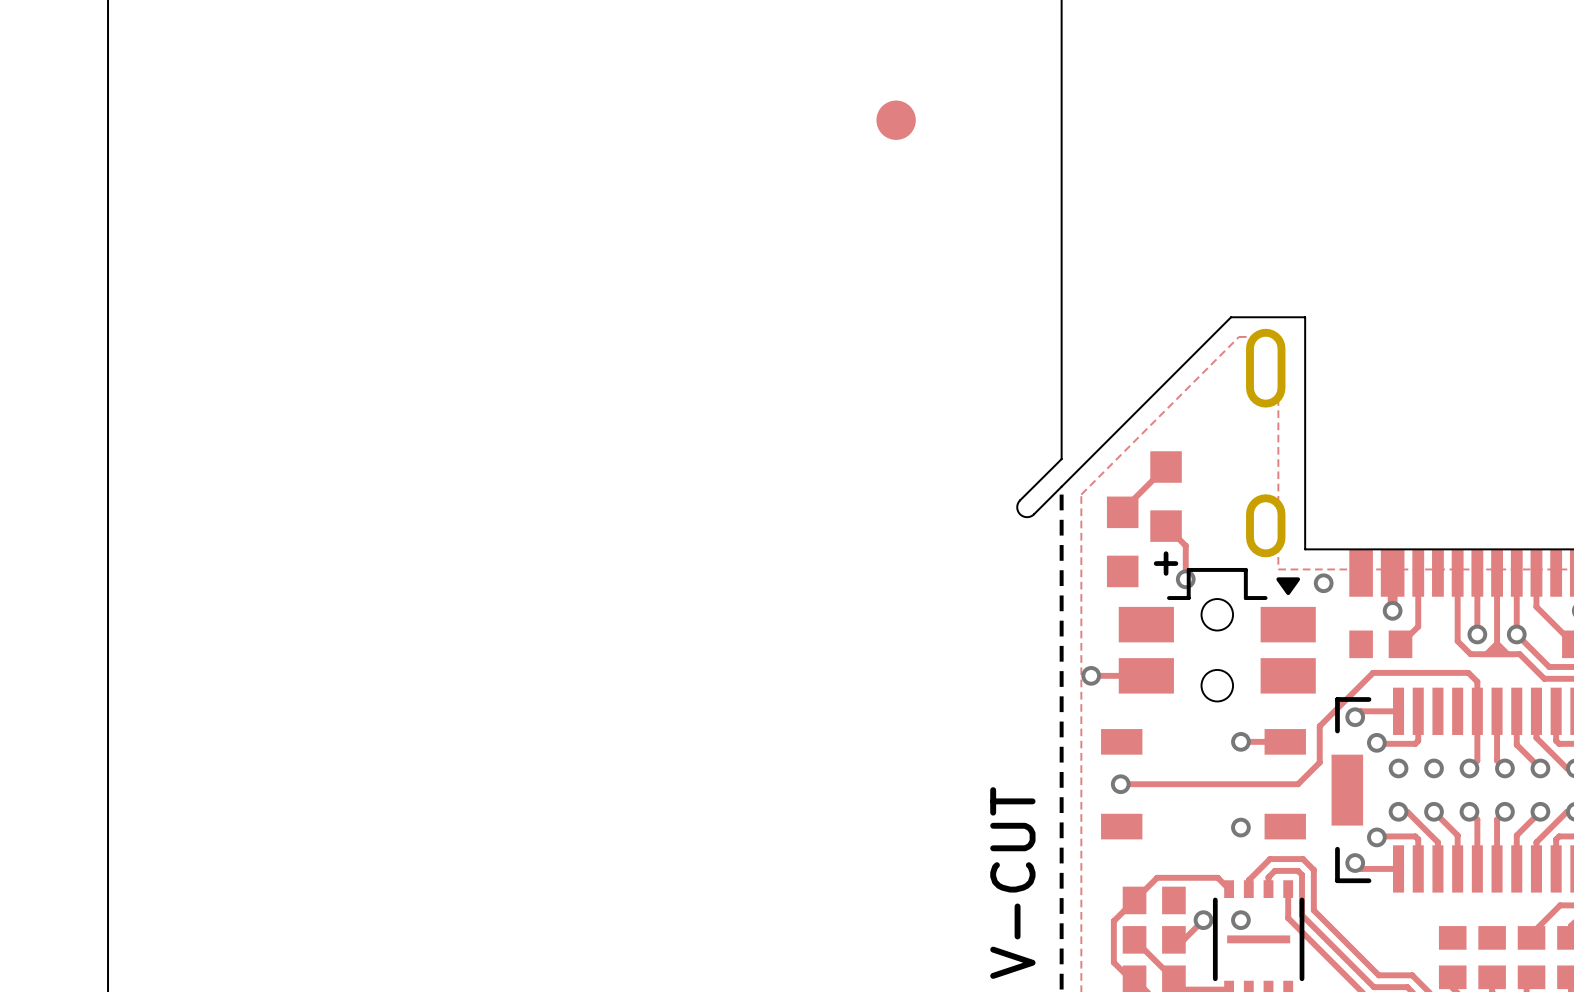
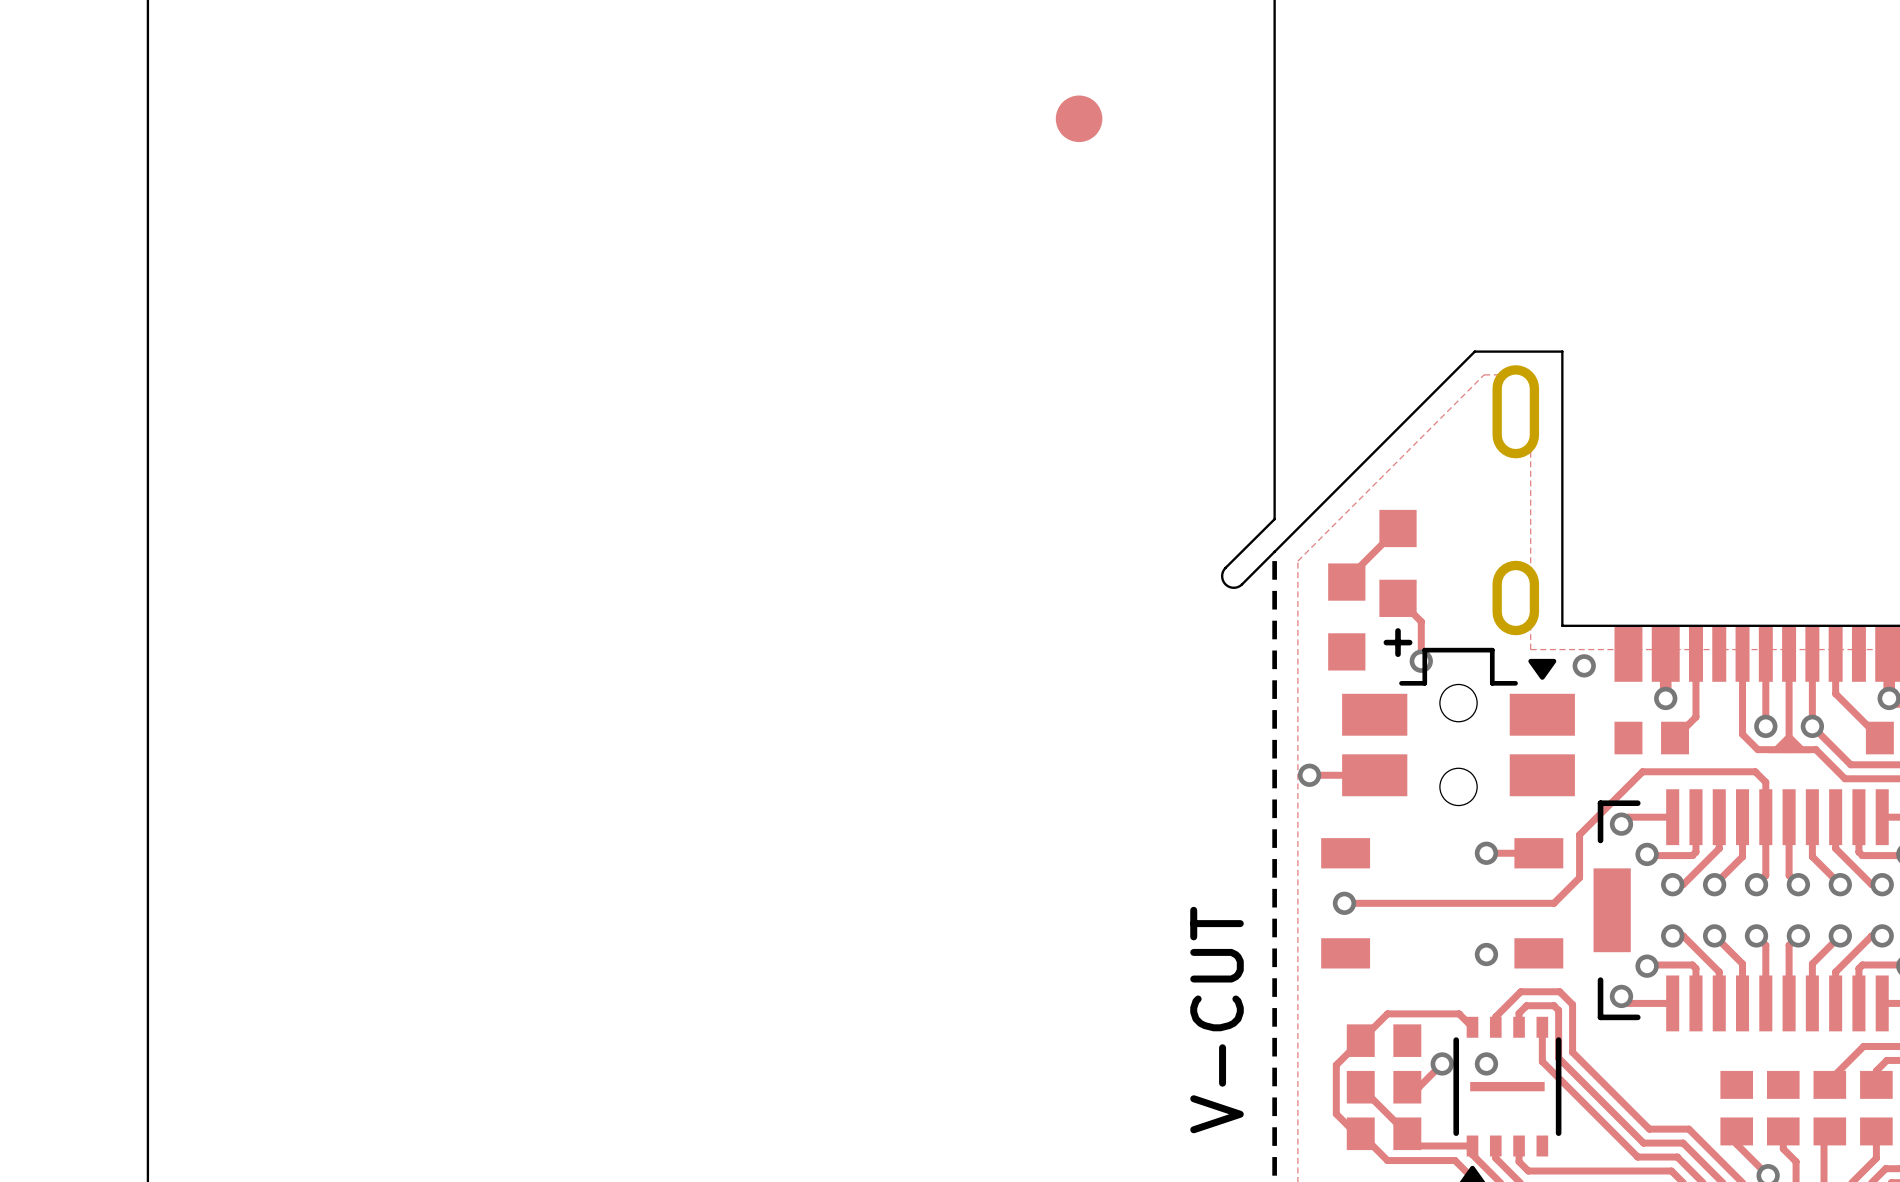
track: none -> (1719, 817) (1719, 848) (1683, 884) (1672, 884)
track: none -> (1742, 817) (1742, 856) (1714, 884)

